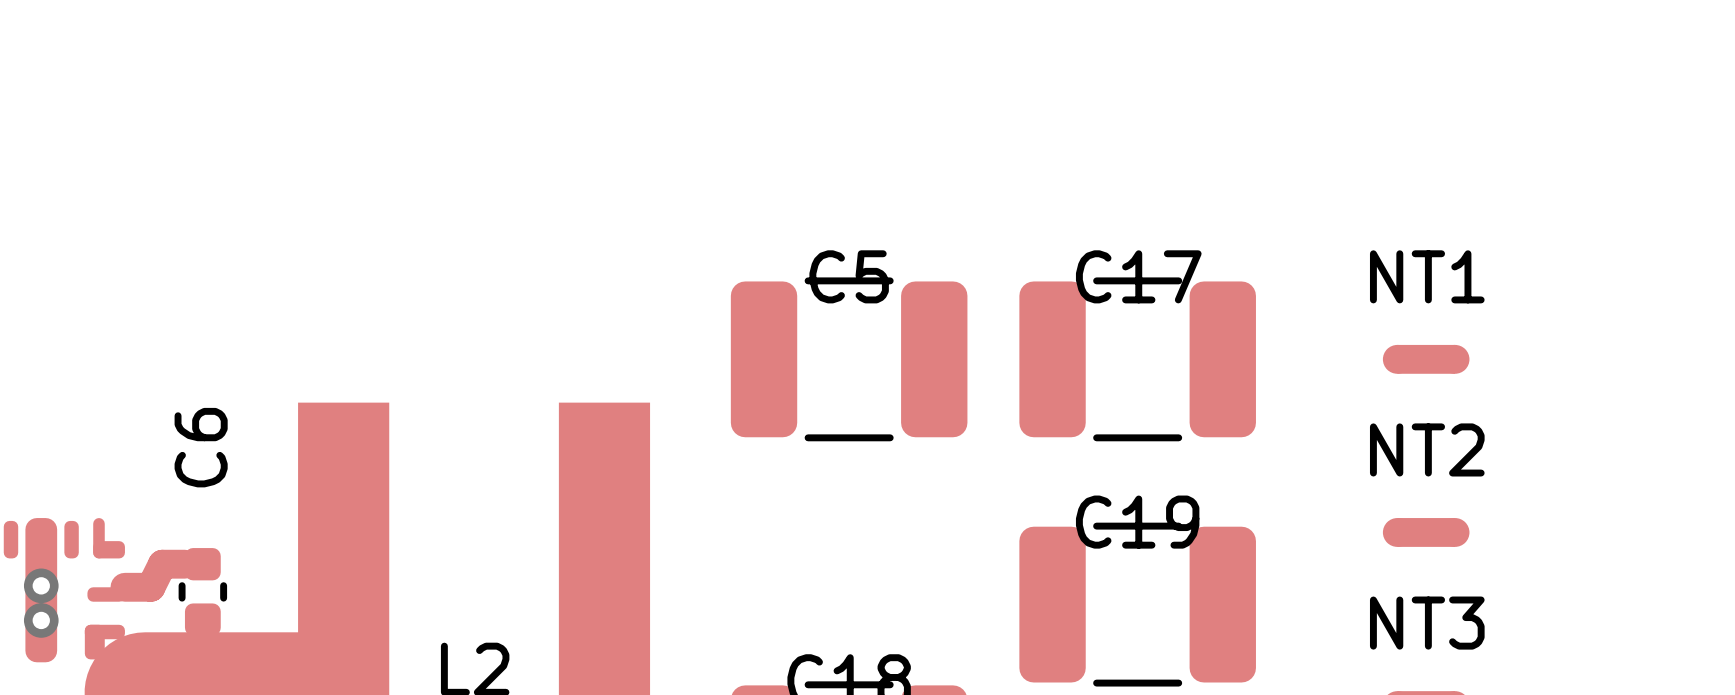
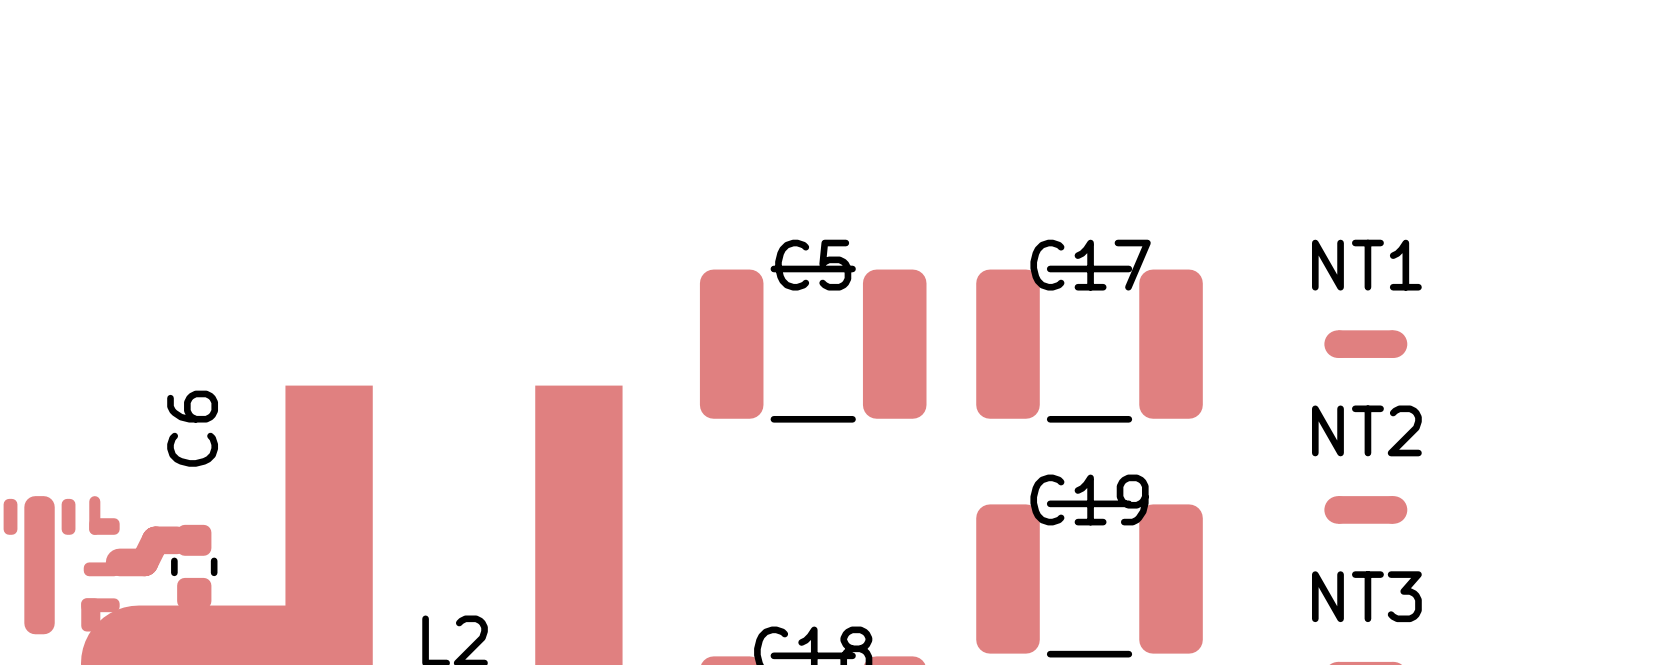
via: (41, 585) -> none
via: (41, 620) -> none

